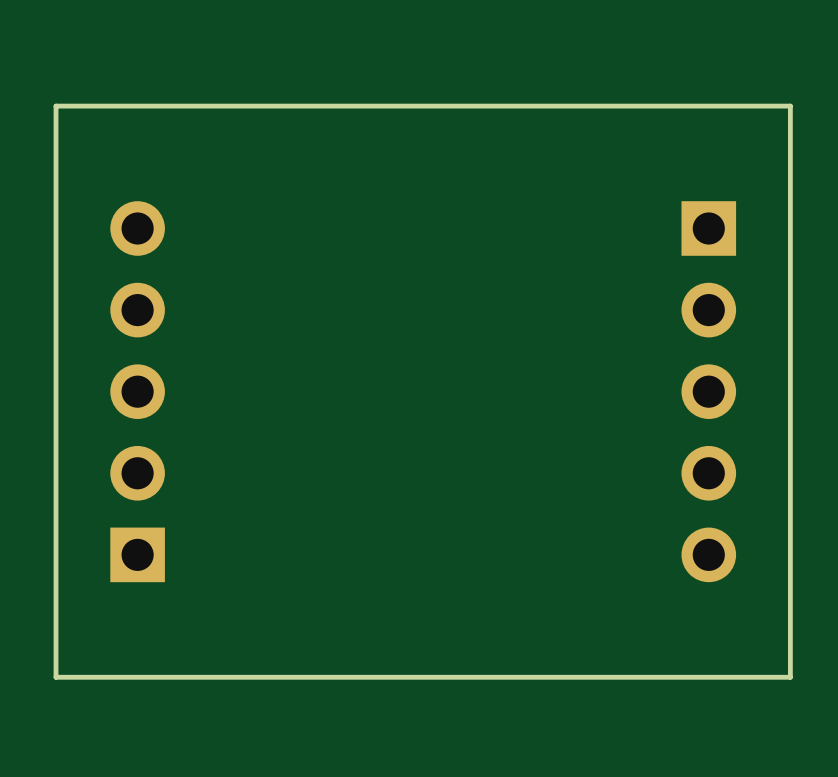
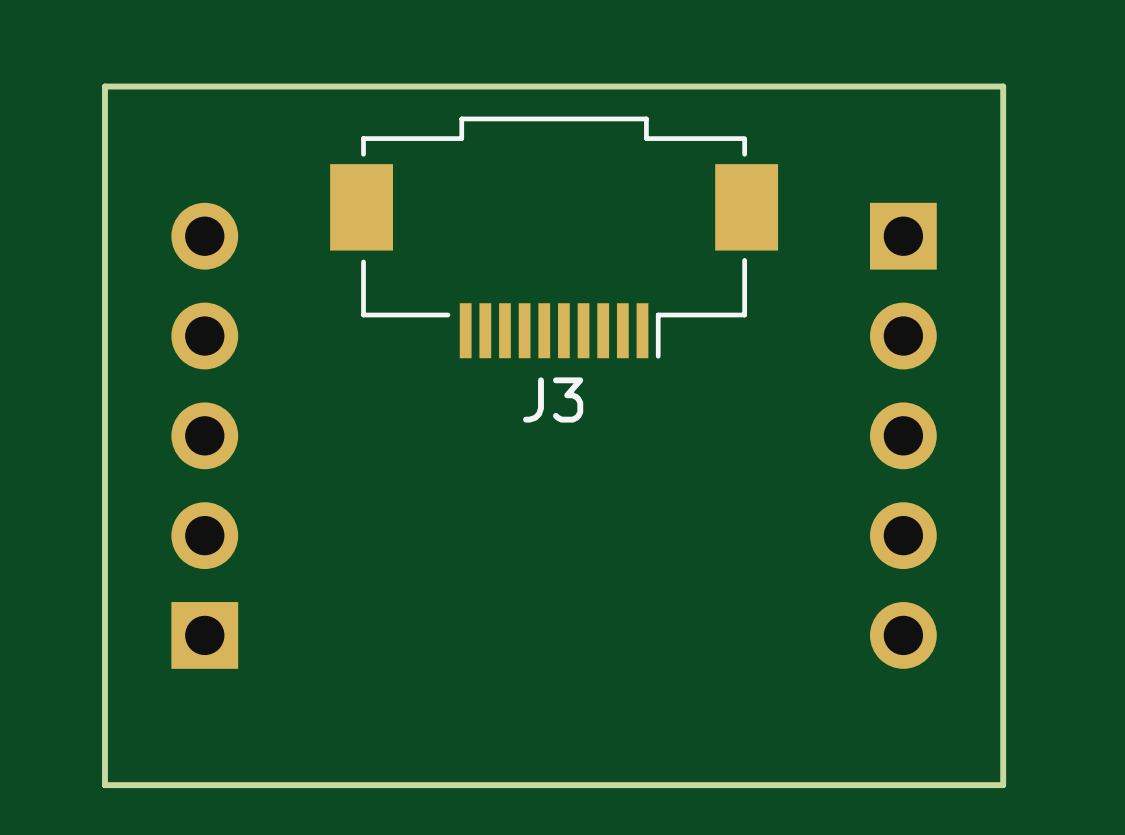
J3: none -> (554, 237)

